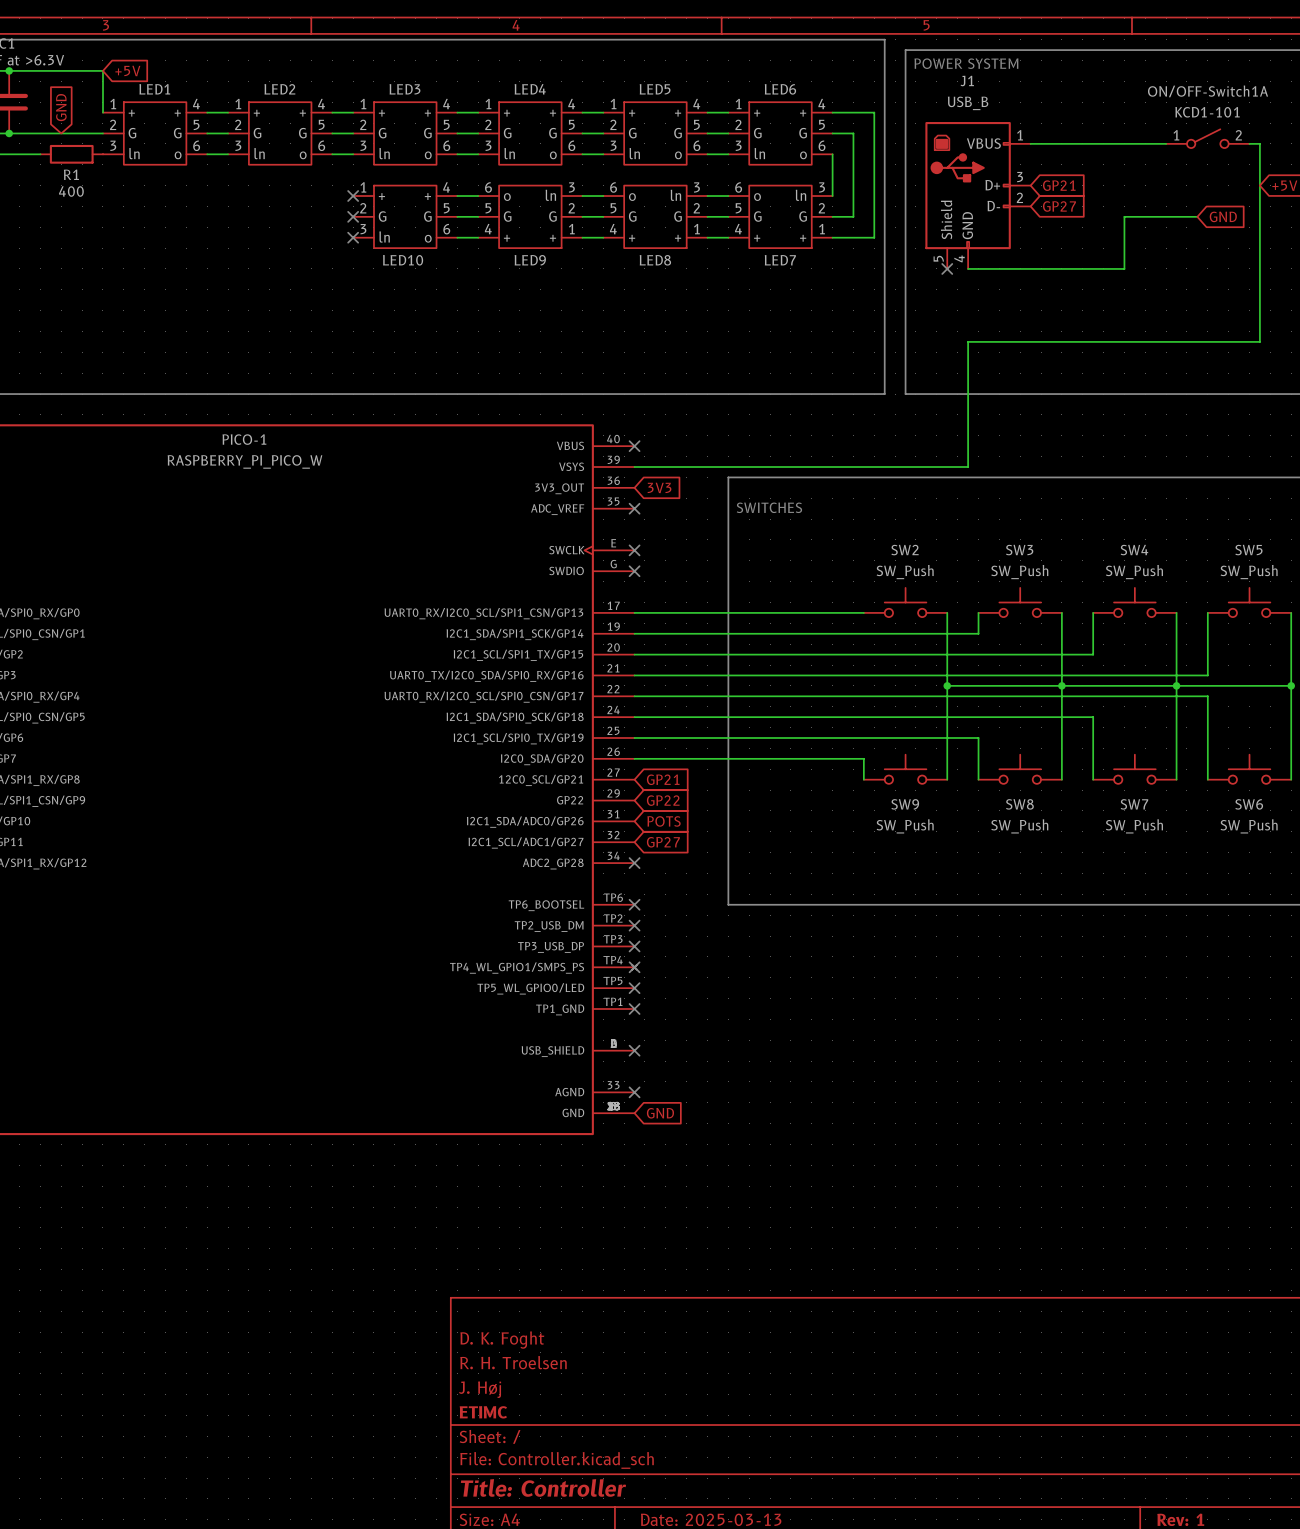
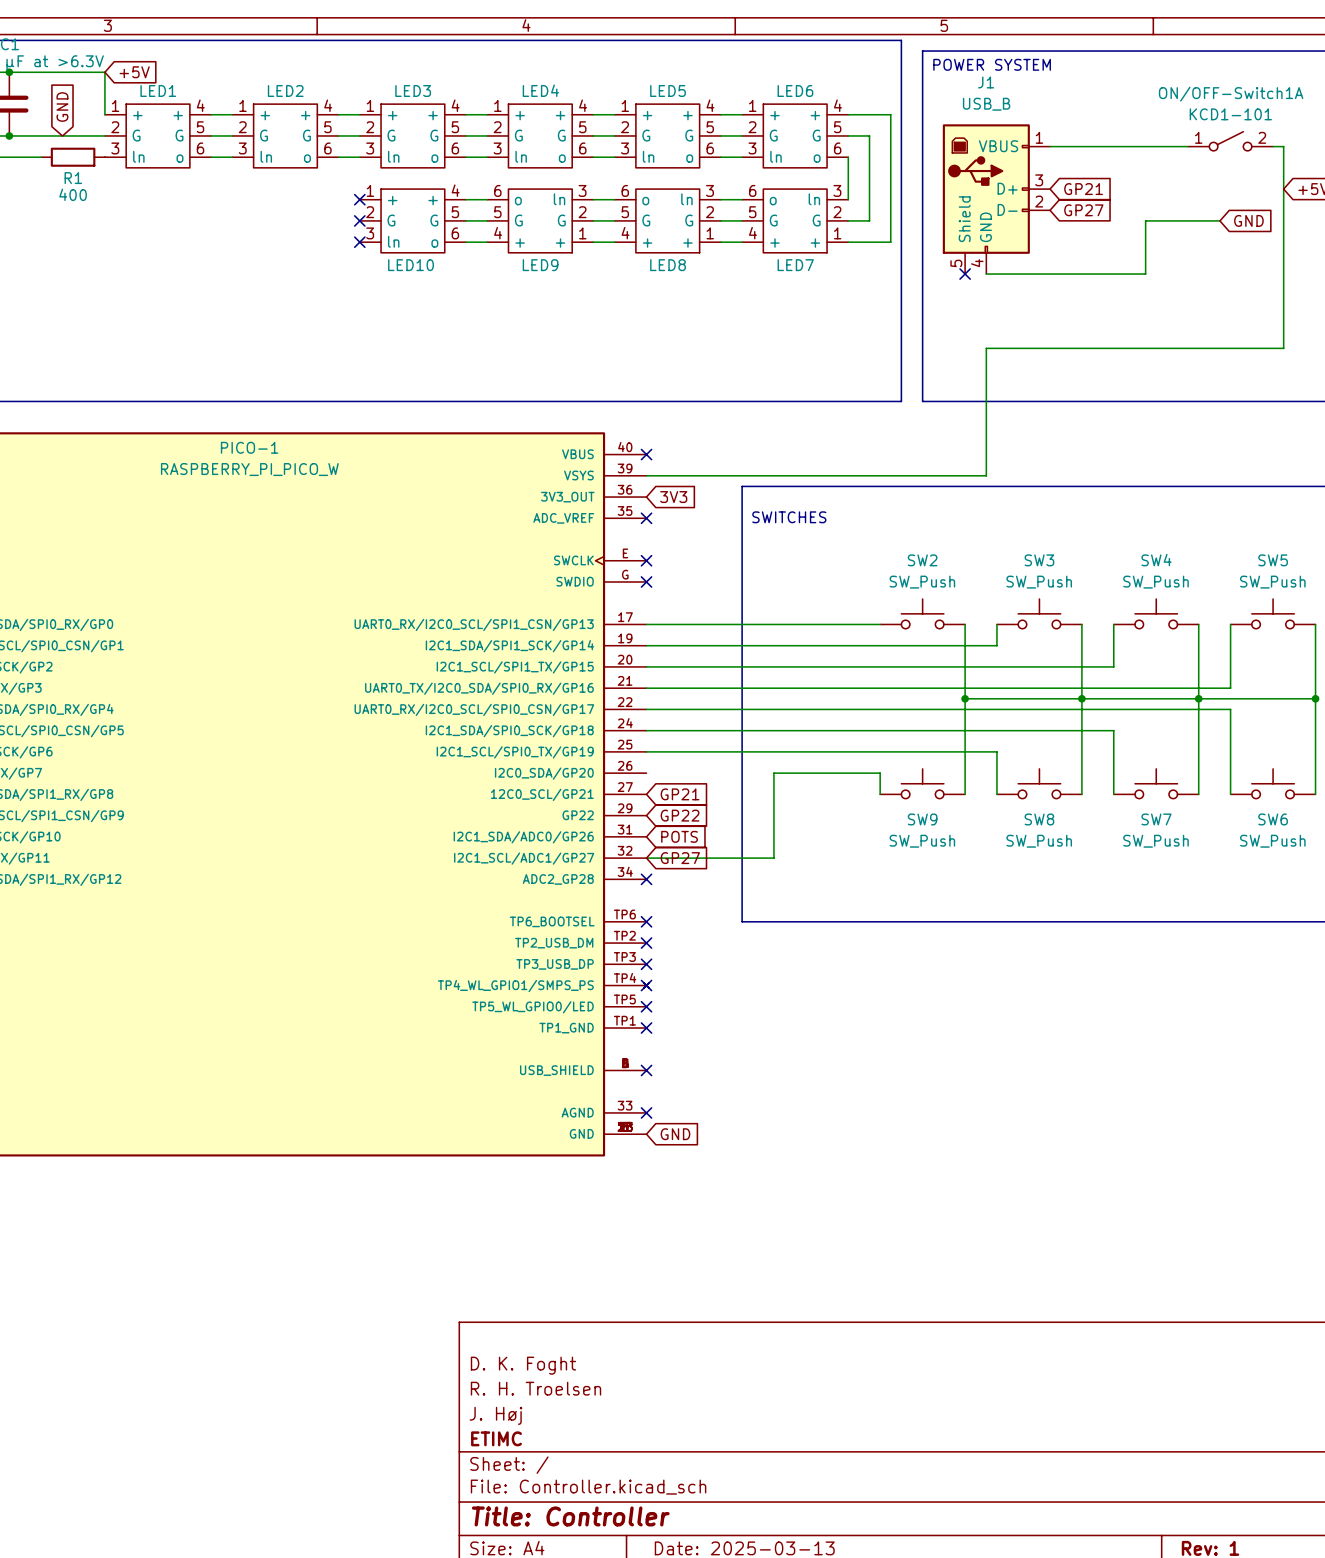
wire: (634, 758) (759, 758) -> (646, 858) (773, 858) (773, 773)

